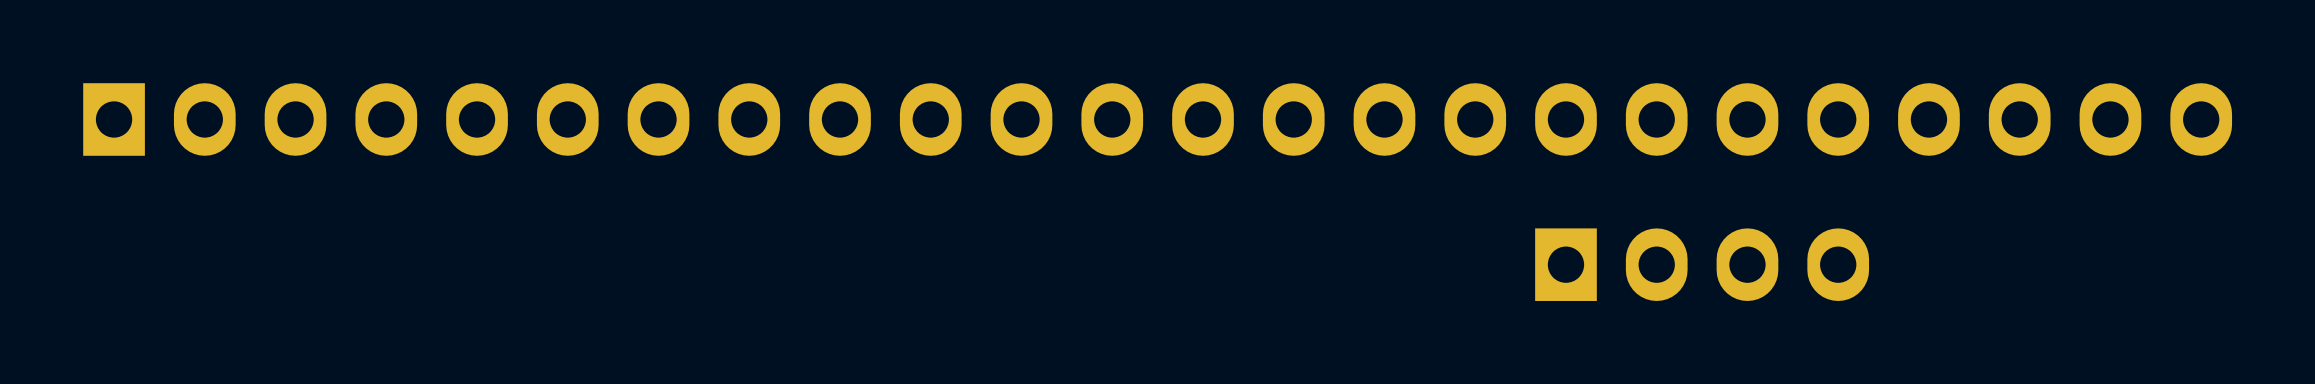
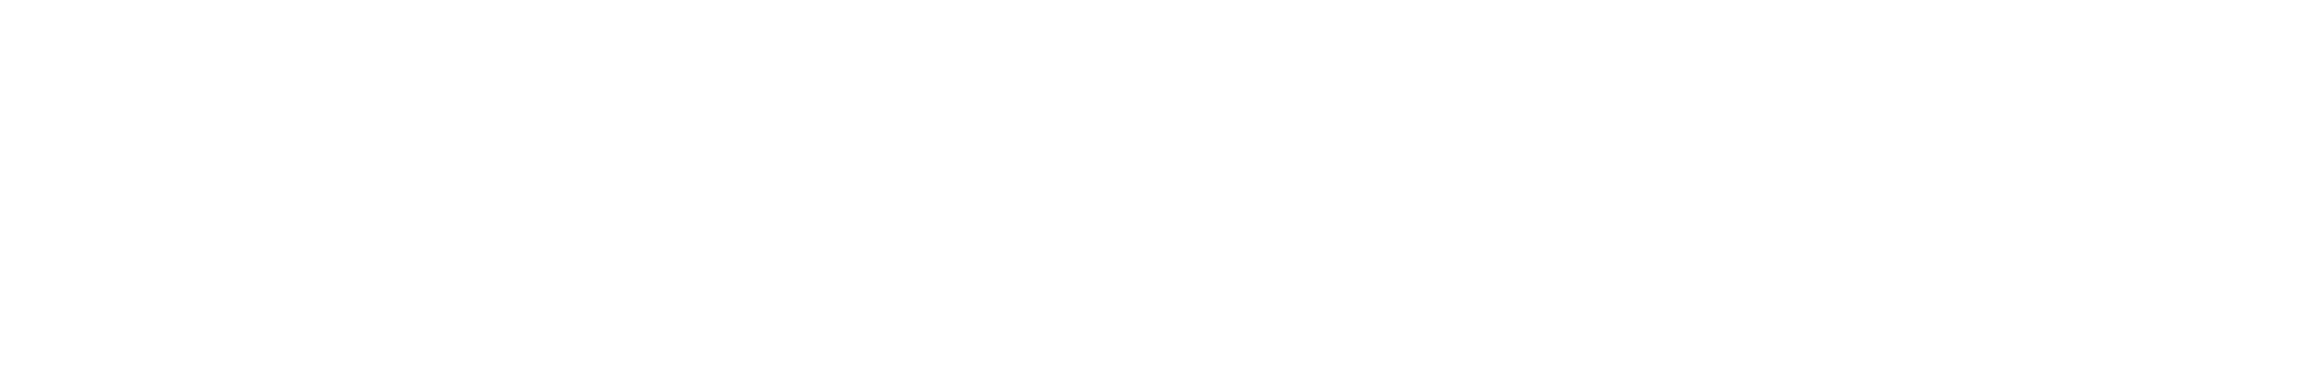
part: (1157, 119) -> none
part: (1702, 264) -> none

